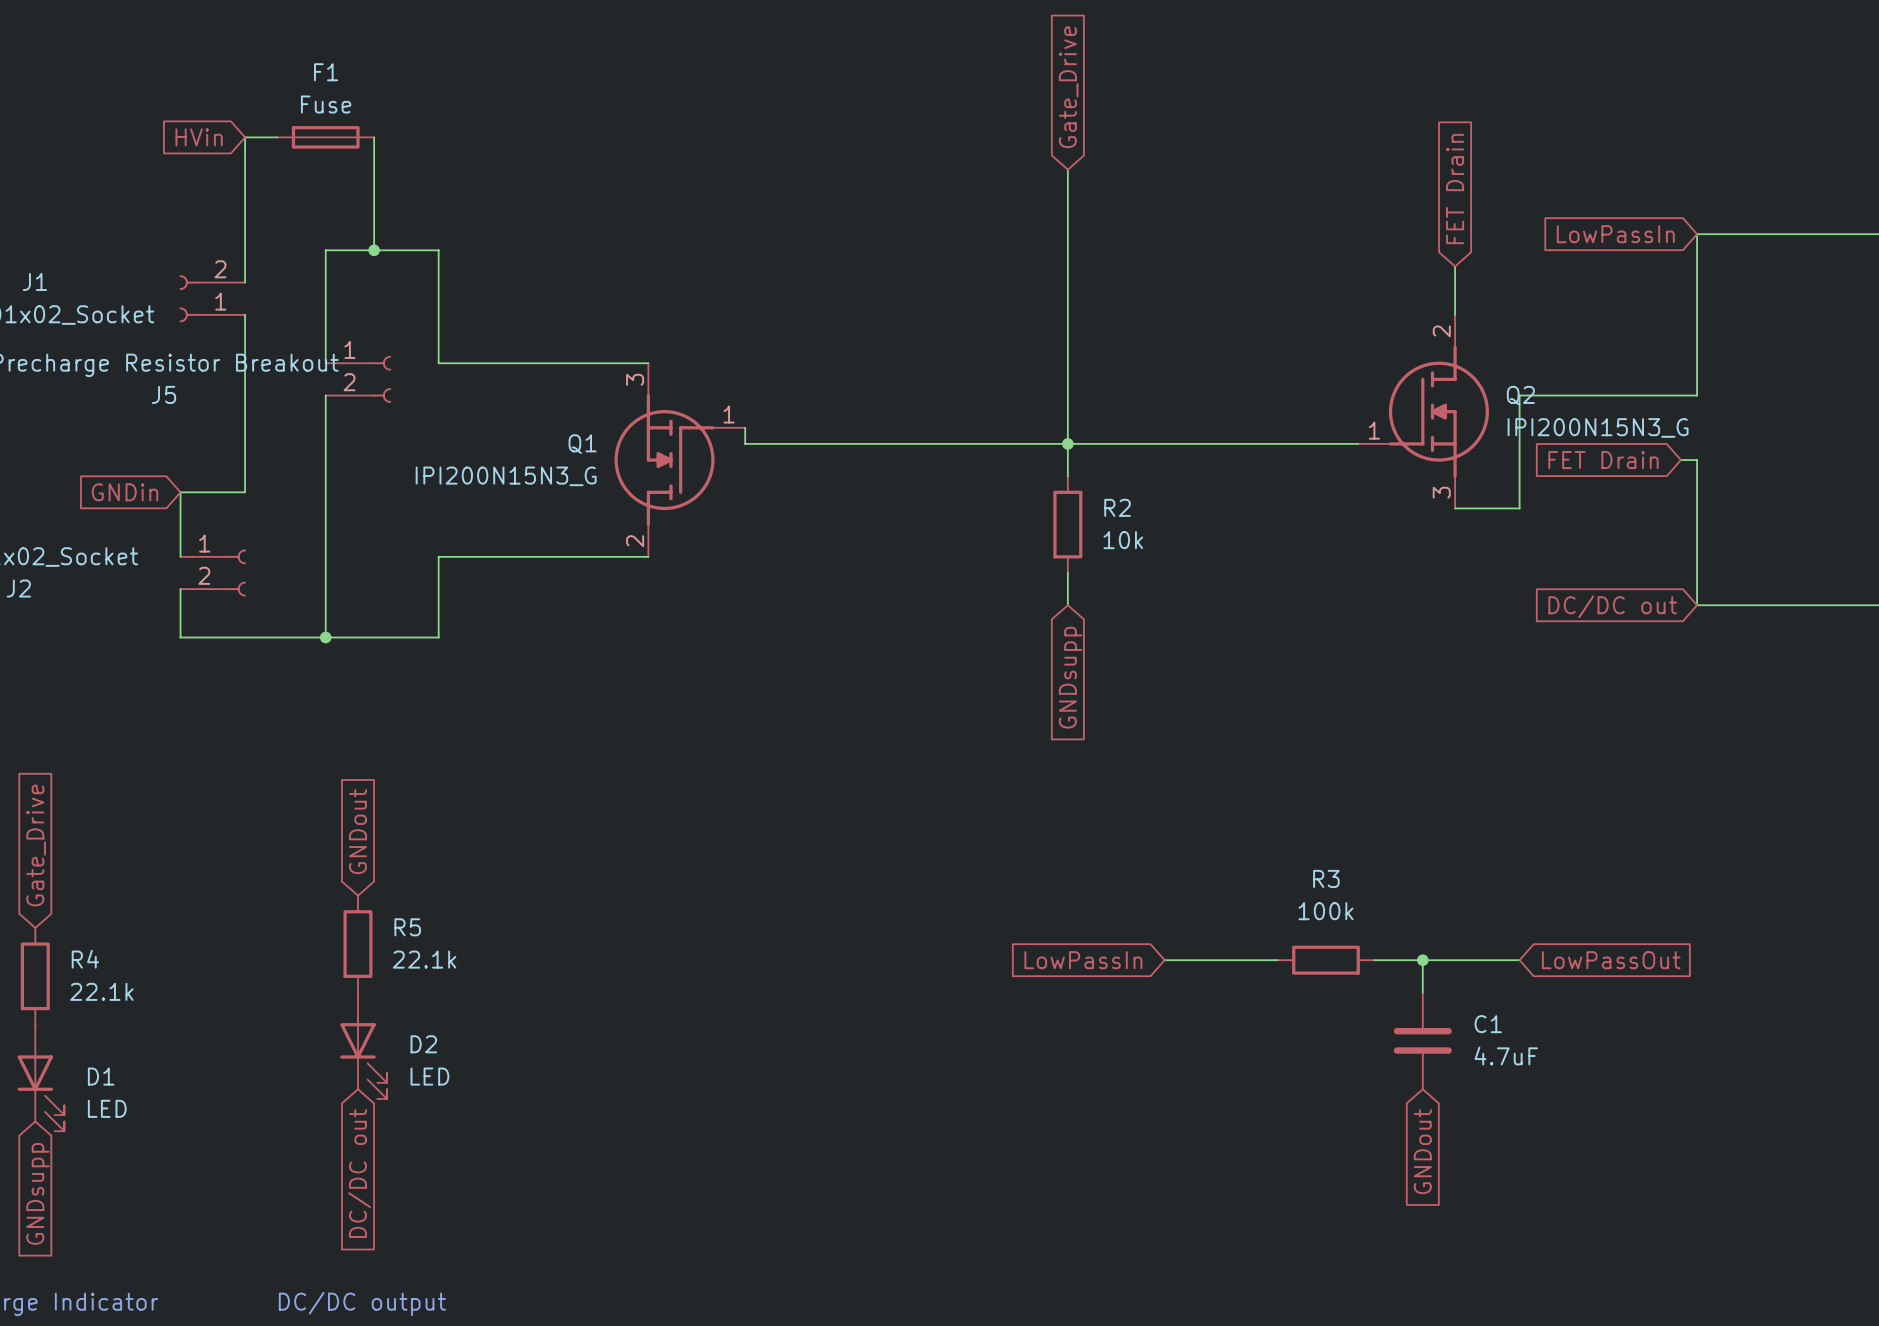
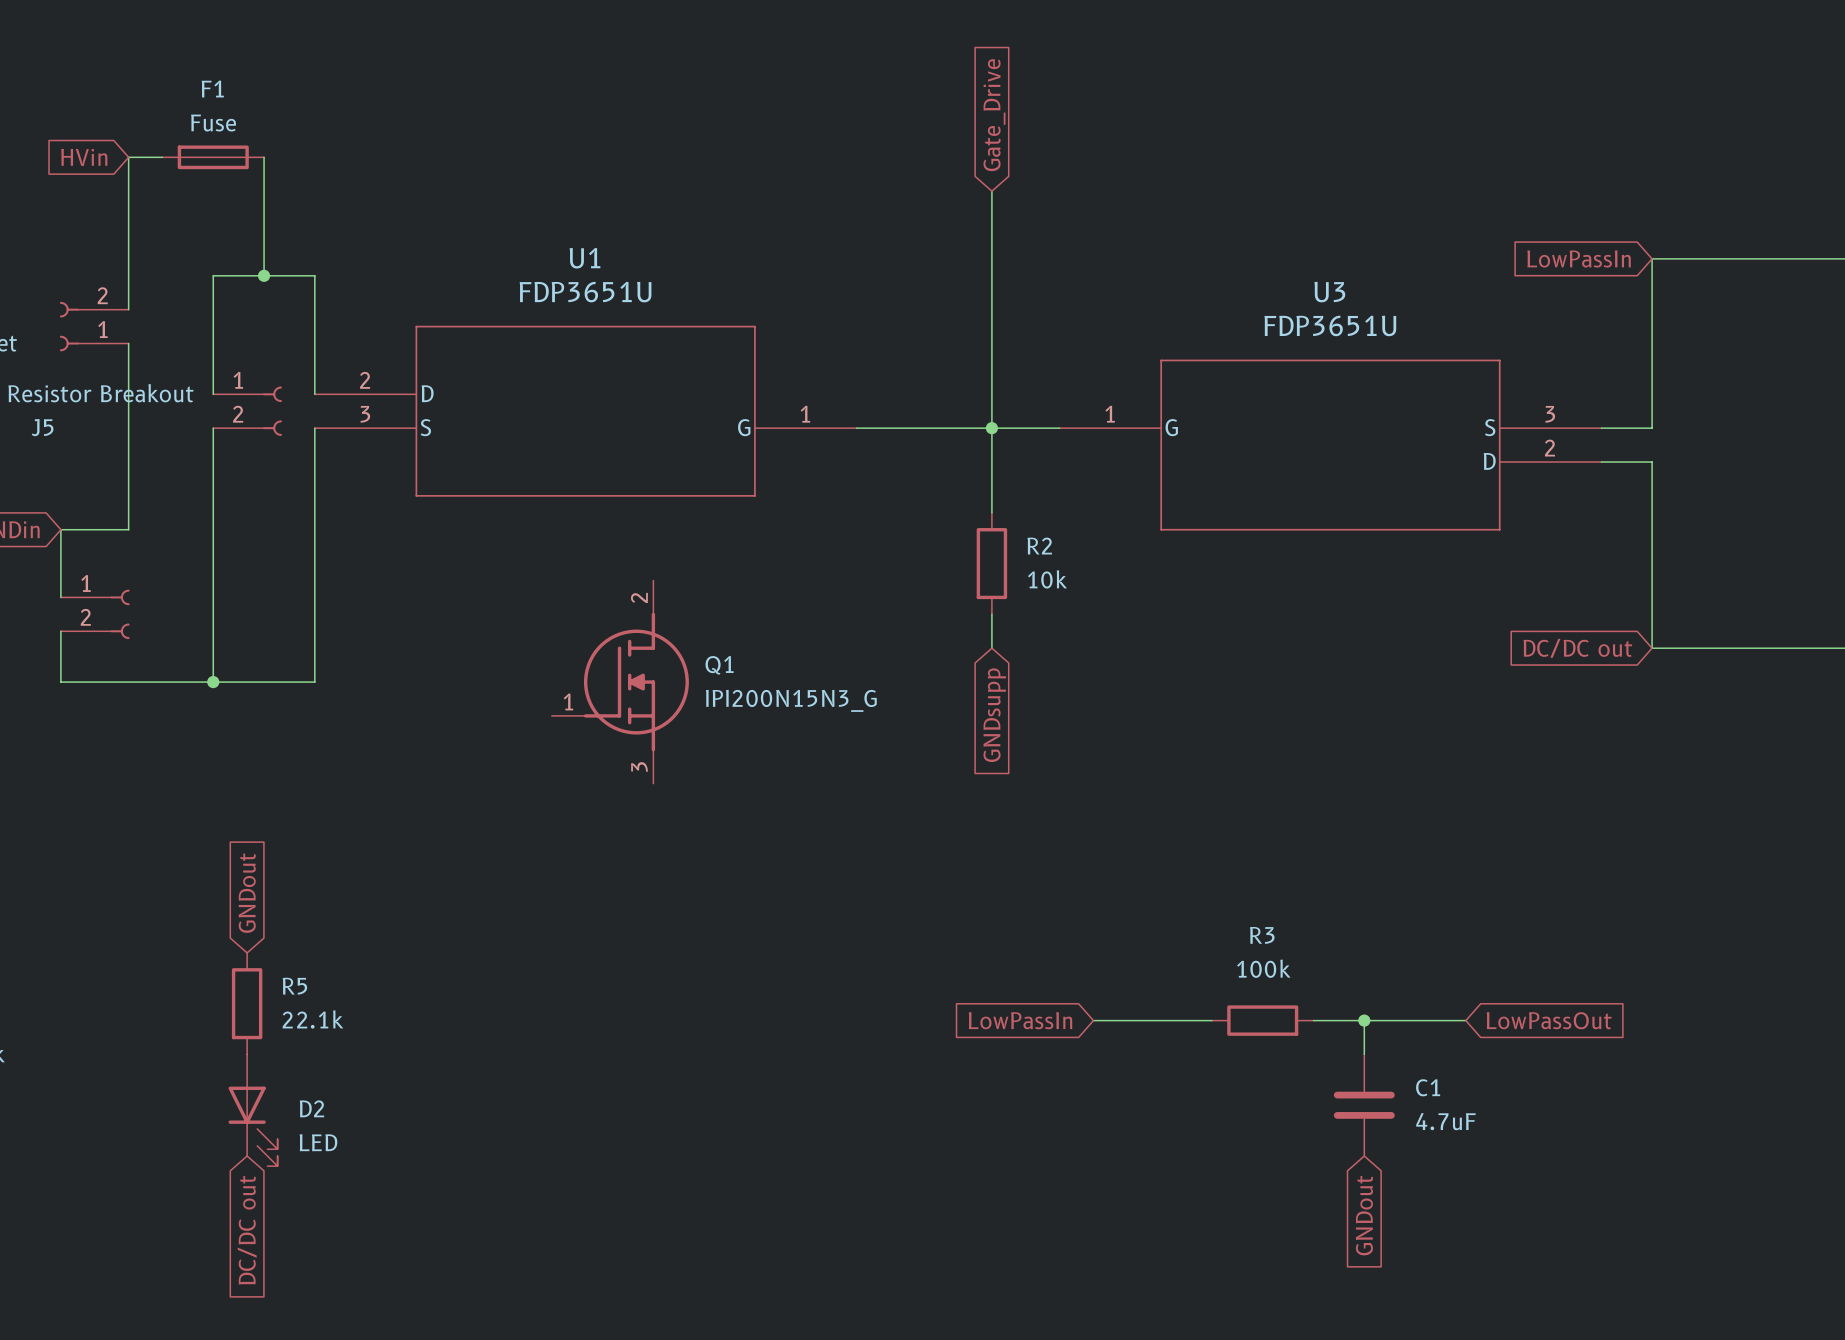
global label: FET Drain (1455, 189) -> none
wire: (422, 250) (438, 250) (438, 363) (648, 363) -> (314, 275) (314, 394)
wire: (1455, 266) (1455, 314) -> none
U1: none -> FDP3651U (585, 411)
wire: none -> (856, 428) (1059, 428)
wire: (1648, 395) (1519, 395) (1519, 508) (1455, 508) -> none
U3: none -> FDP3651U (1330, 445)
Q2: IPI200N15N3_G (1423, 411) -> none
wire: (745, 427) (745, 443) (1358, 443) -> none
junction position: (1067, 443) -> (991, 428)
Q1 name position: Q1 (582, 444) -> Q1 (719, 665)
Q1 rotation: 0° (664, 460) -> 180° (636, 682)
Q1 position: (679, 460) -> (620, 682)
global label: FET Drain (1603, 460) -> none
wire: (1680, 460) (1697, 460) -> (1601, 462) (1652, 462) (1652, 495)
Q1 value position: IPI200N15N3_G (506, 476) -> IPI200N15N3_G (791, 700)
wire: (648, 556) (438, 556) (438, 637) (422, 637) -> (314, 428) (314, 682)

